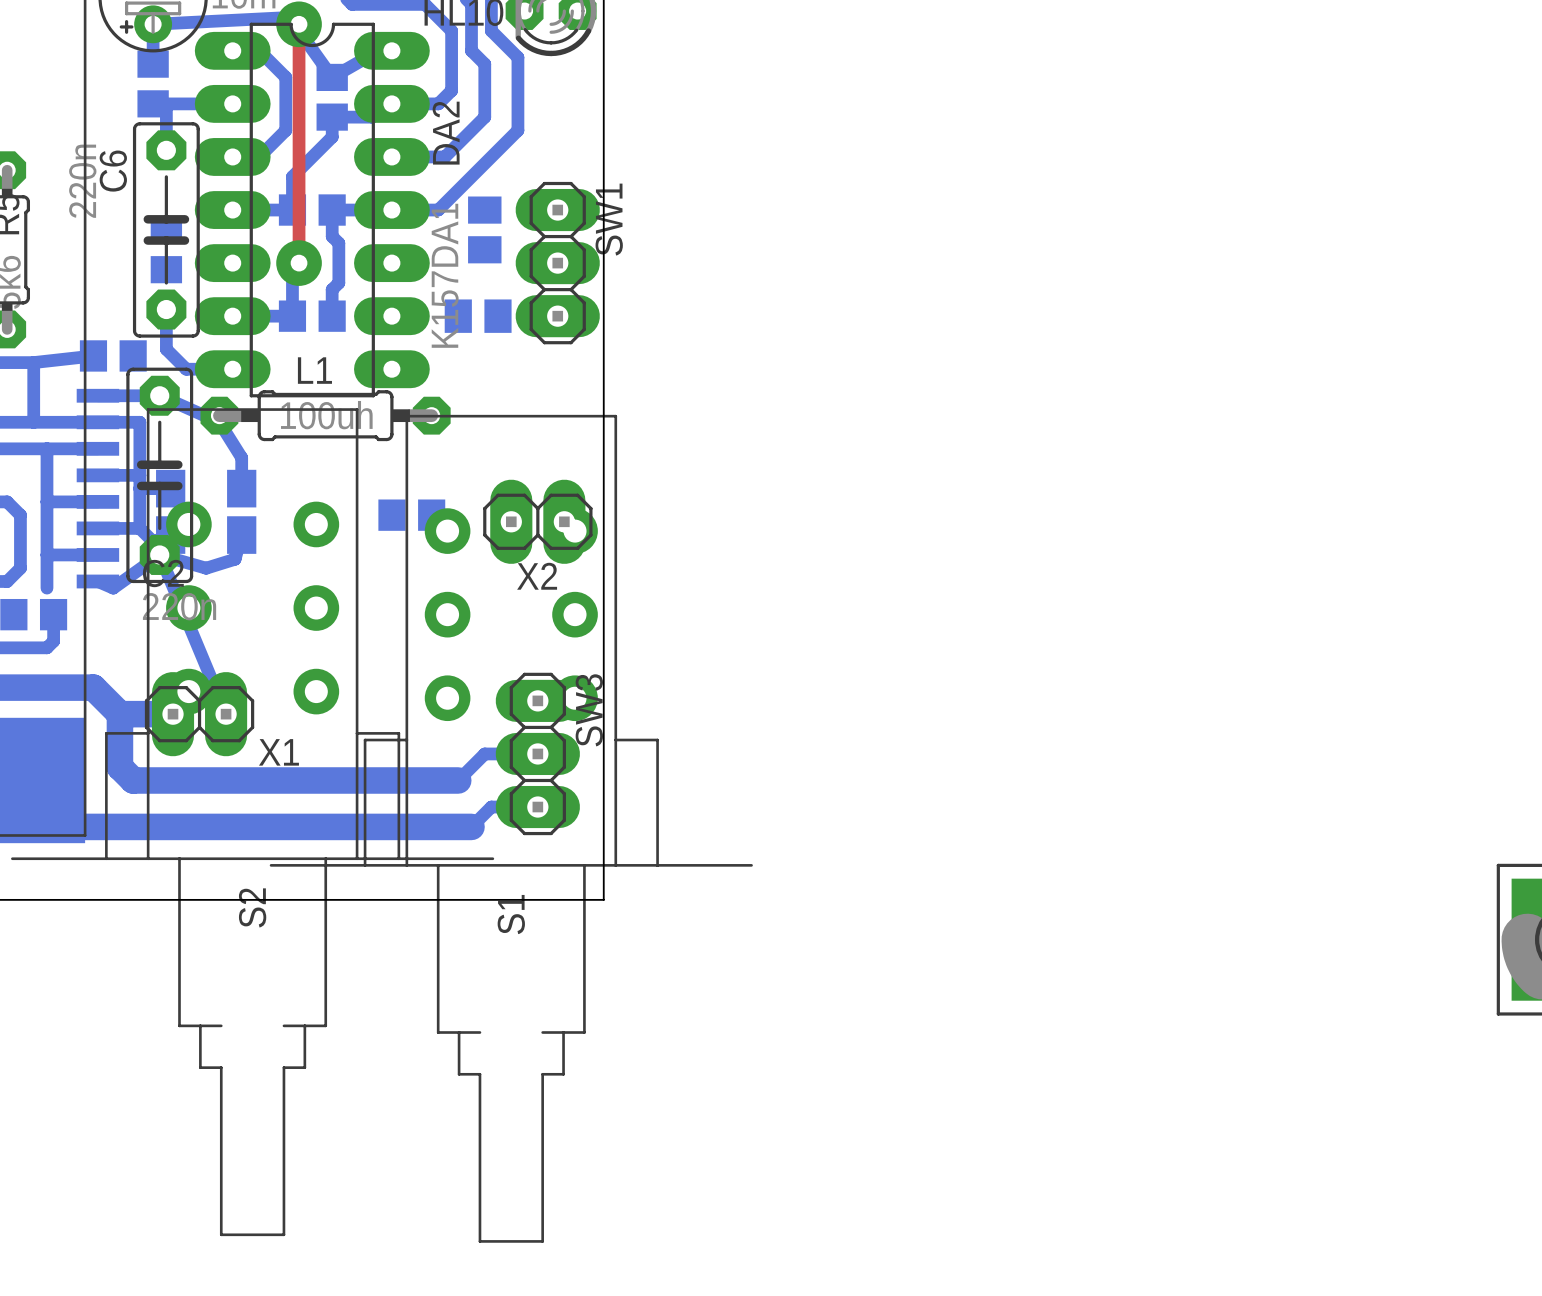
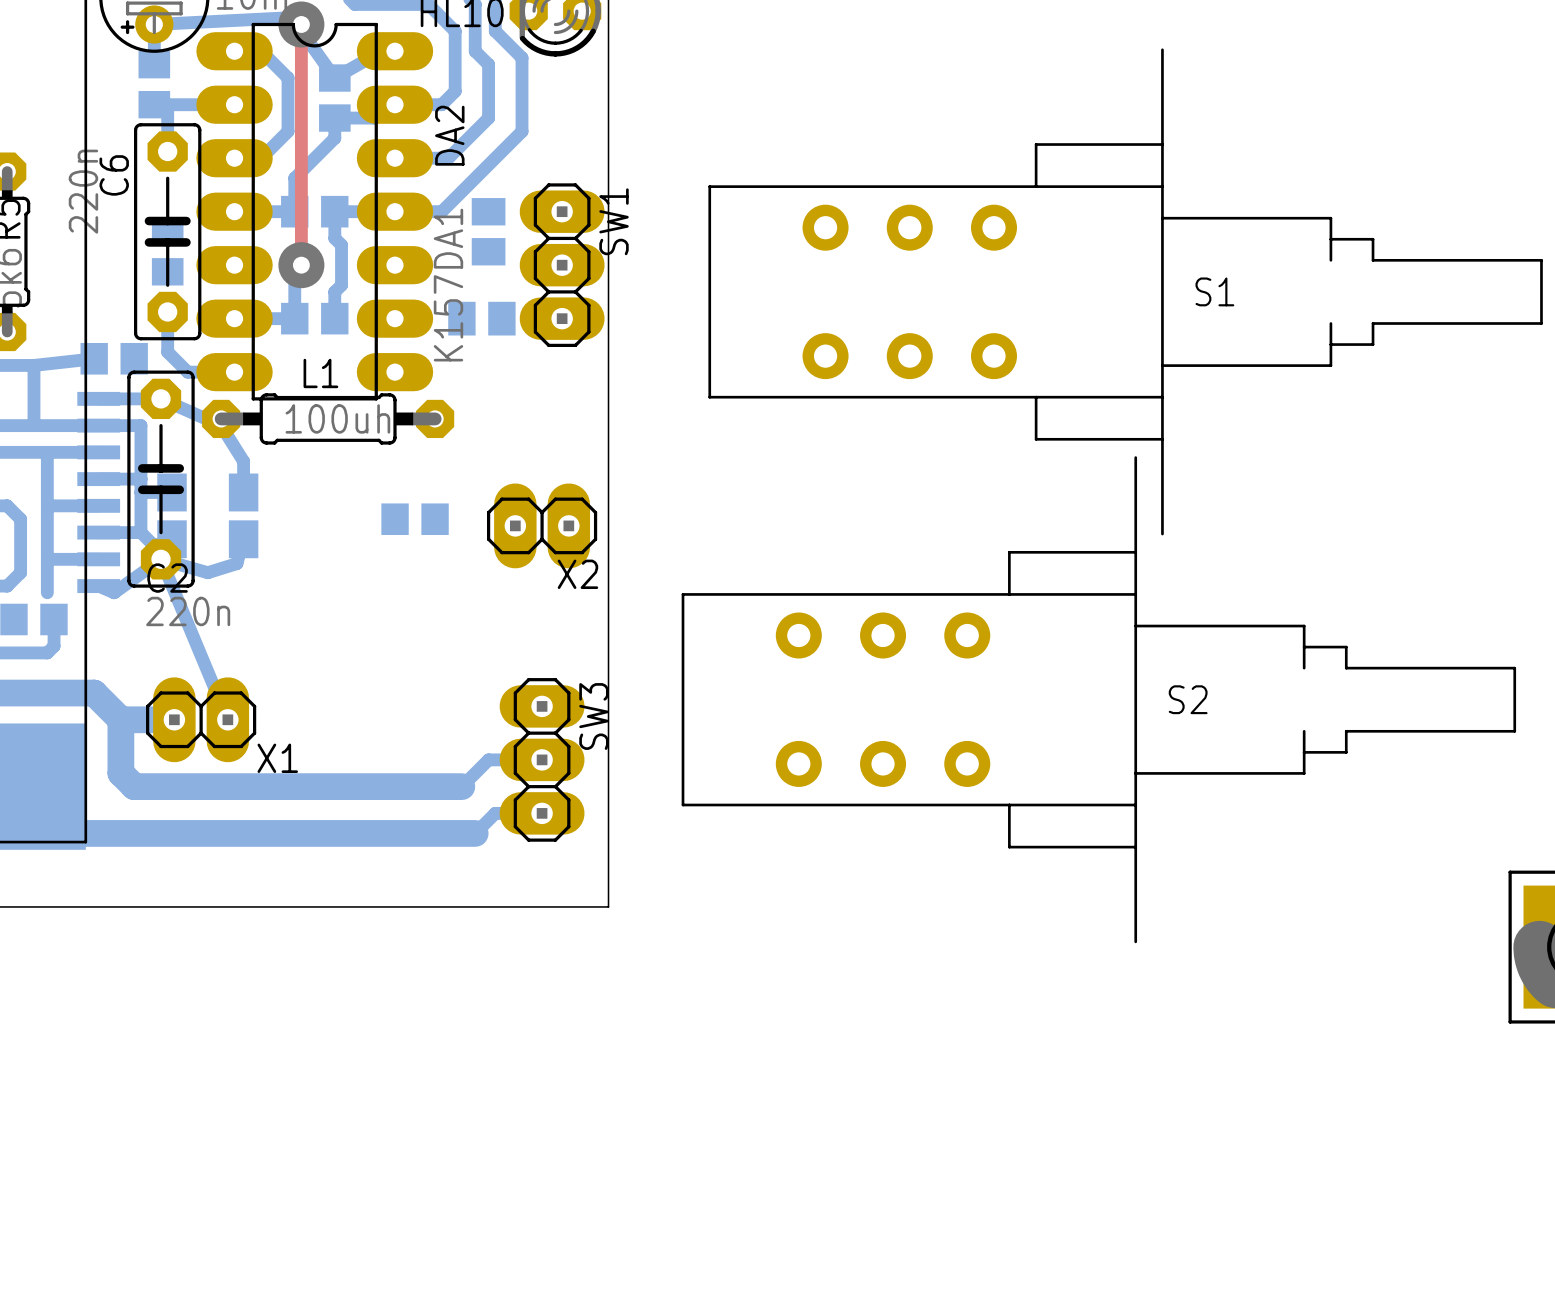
X2 name position: X2 (537, 576) -> X2 (577, 574)
S2 rotation: 0° (252, 822) -> 90° counterclockwise (1098, 699)
S2 position: (252, 822) -> (1098, 699)
S1 rotation: 0° (511, 828) -> 90° counterclockwise (1125, 291)
S1 position: (511, 828) -> (1125, 291)

